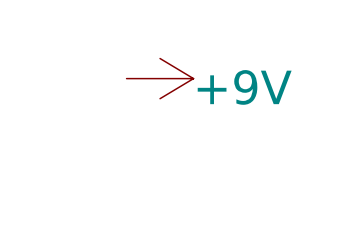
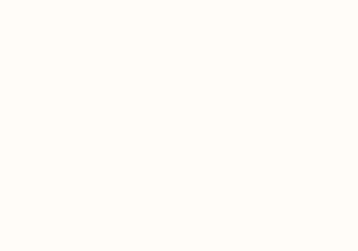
power symbol: +9V (160, 78) -> none

